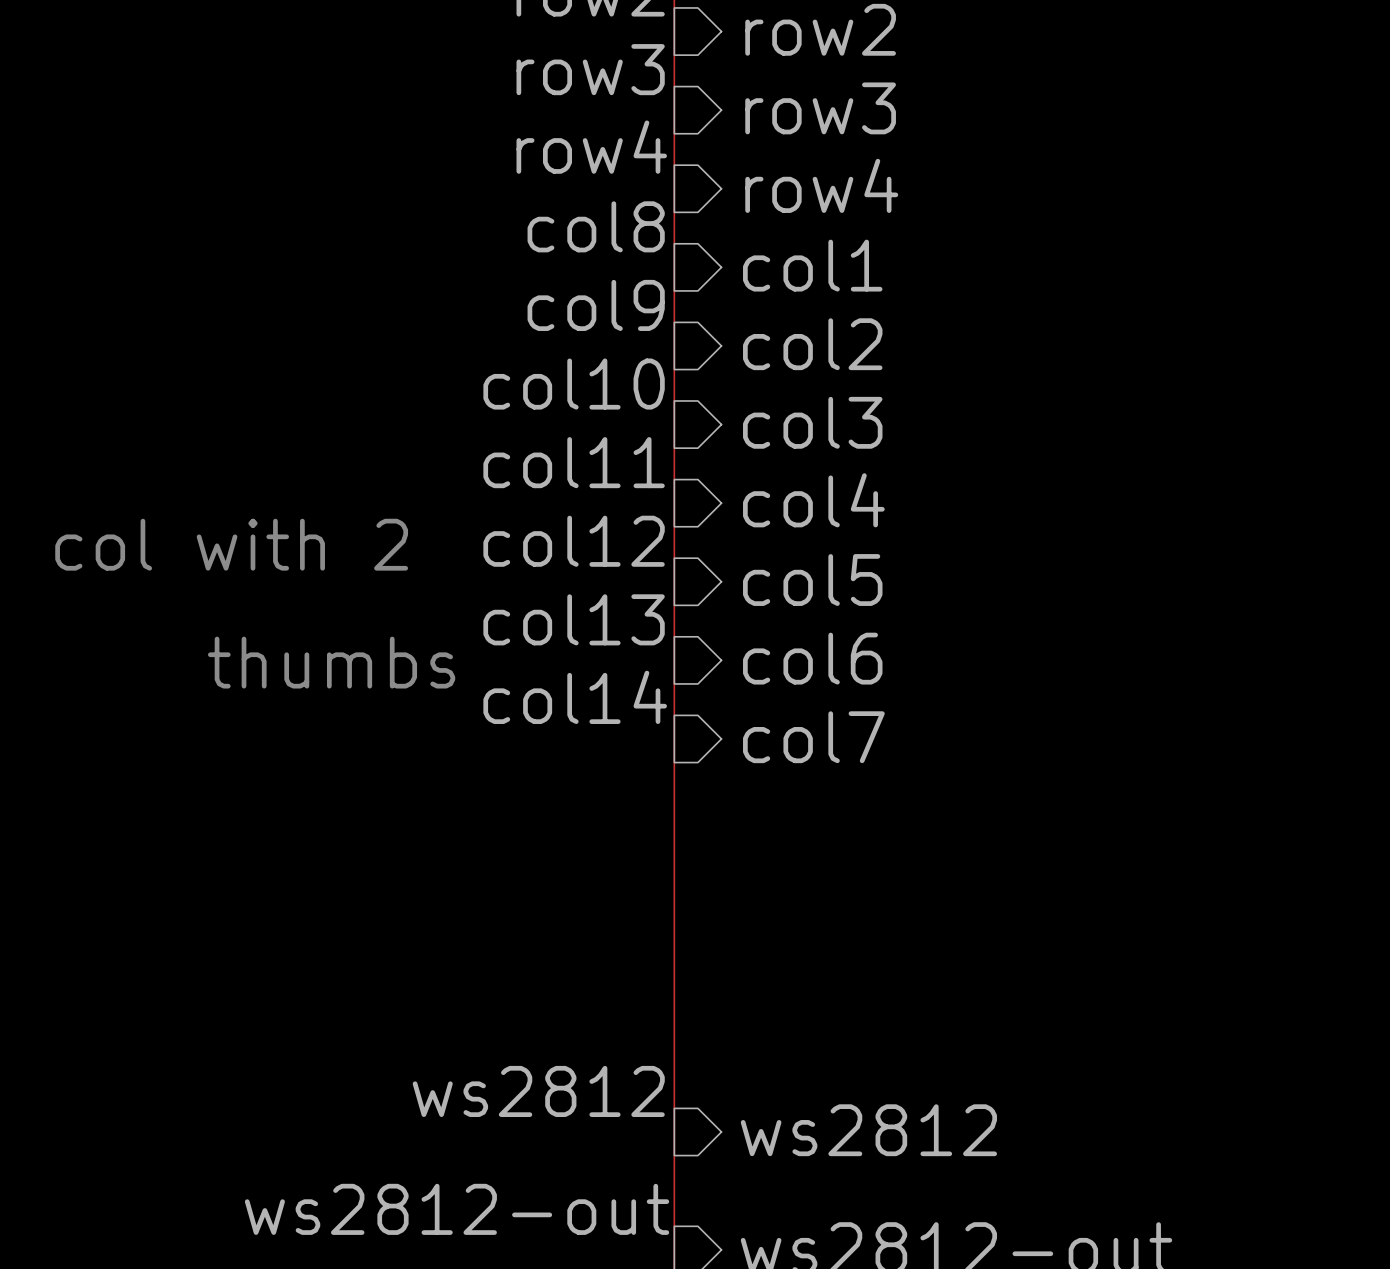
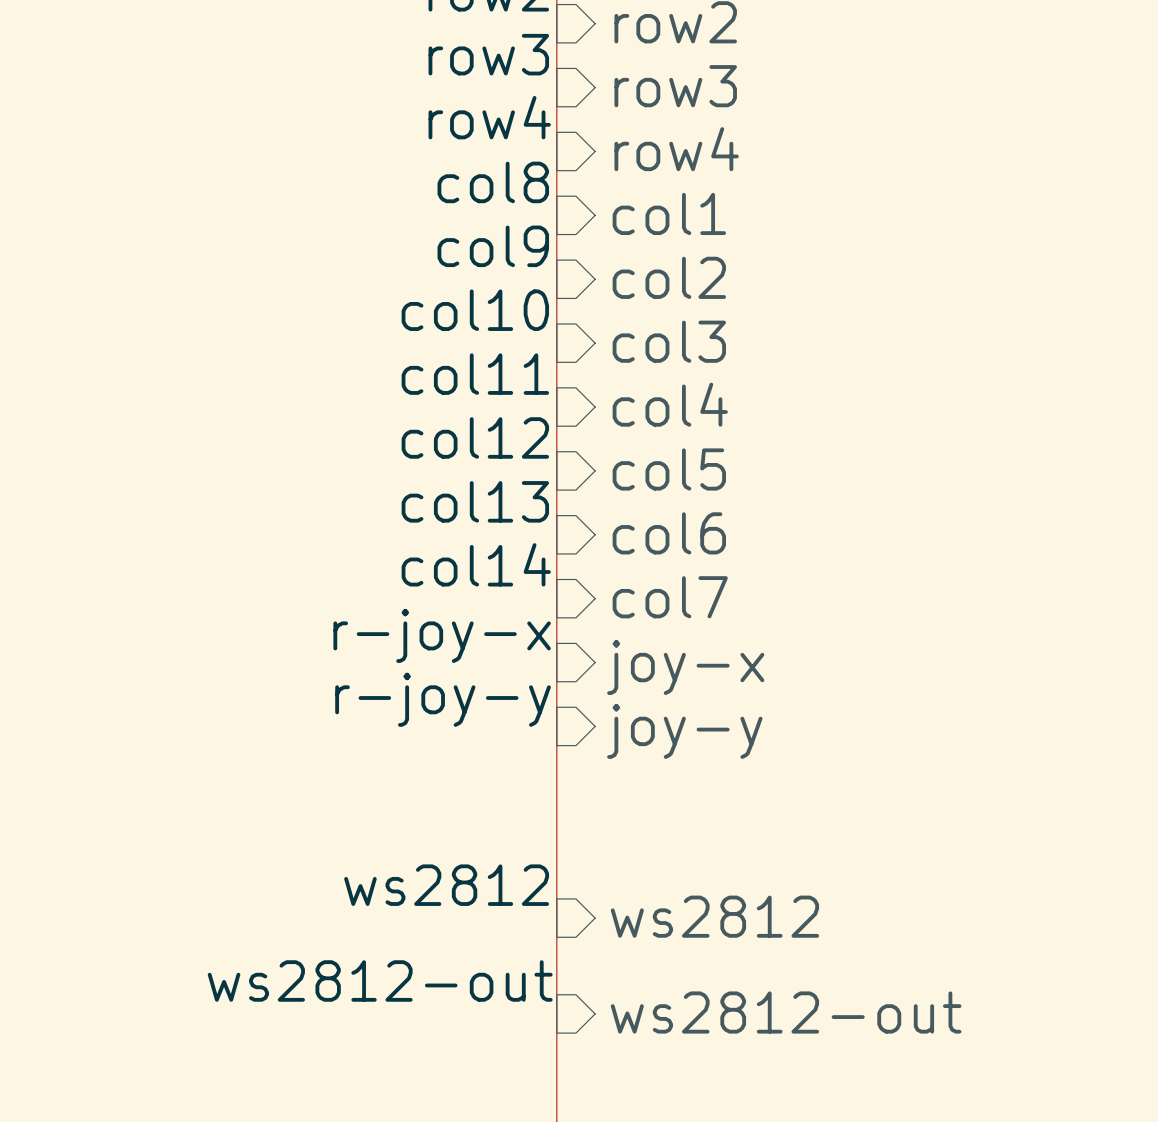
text: col with 2 (231, 544) -> none
text: thumbs (331, 662) -> none
label: none -> r-joy-x (442, 635)
sheet pin: none -> joy-x (685, 667)
label: none -> r-joy-y (443, 699)
sheet pin: none -> joy-y (684, 731)

